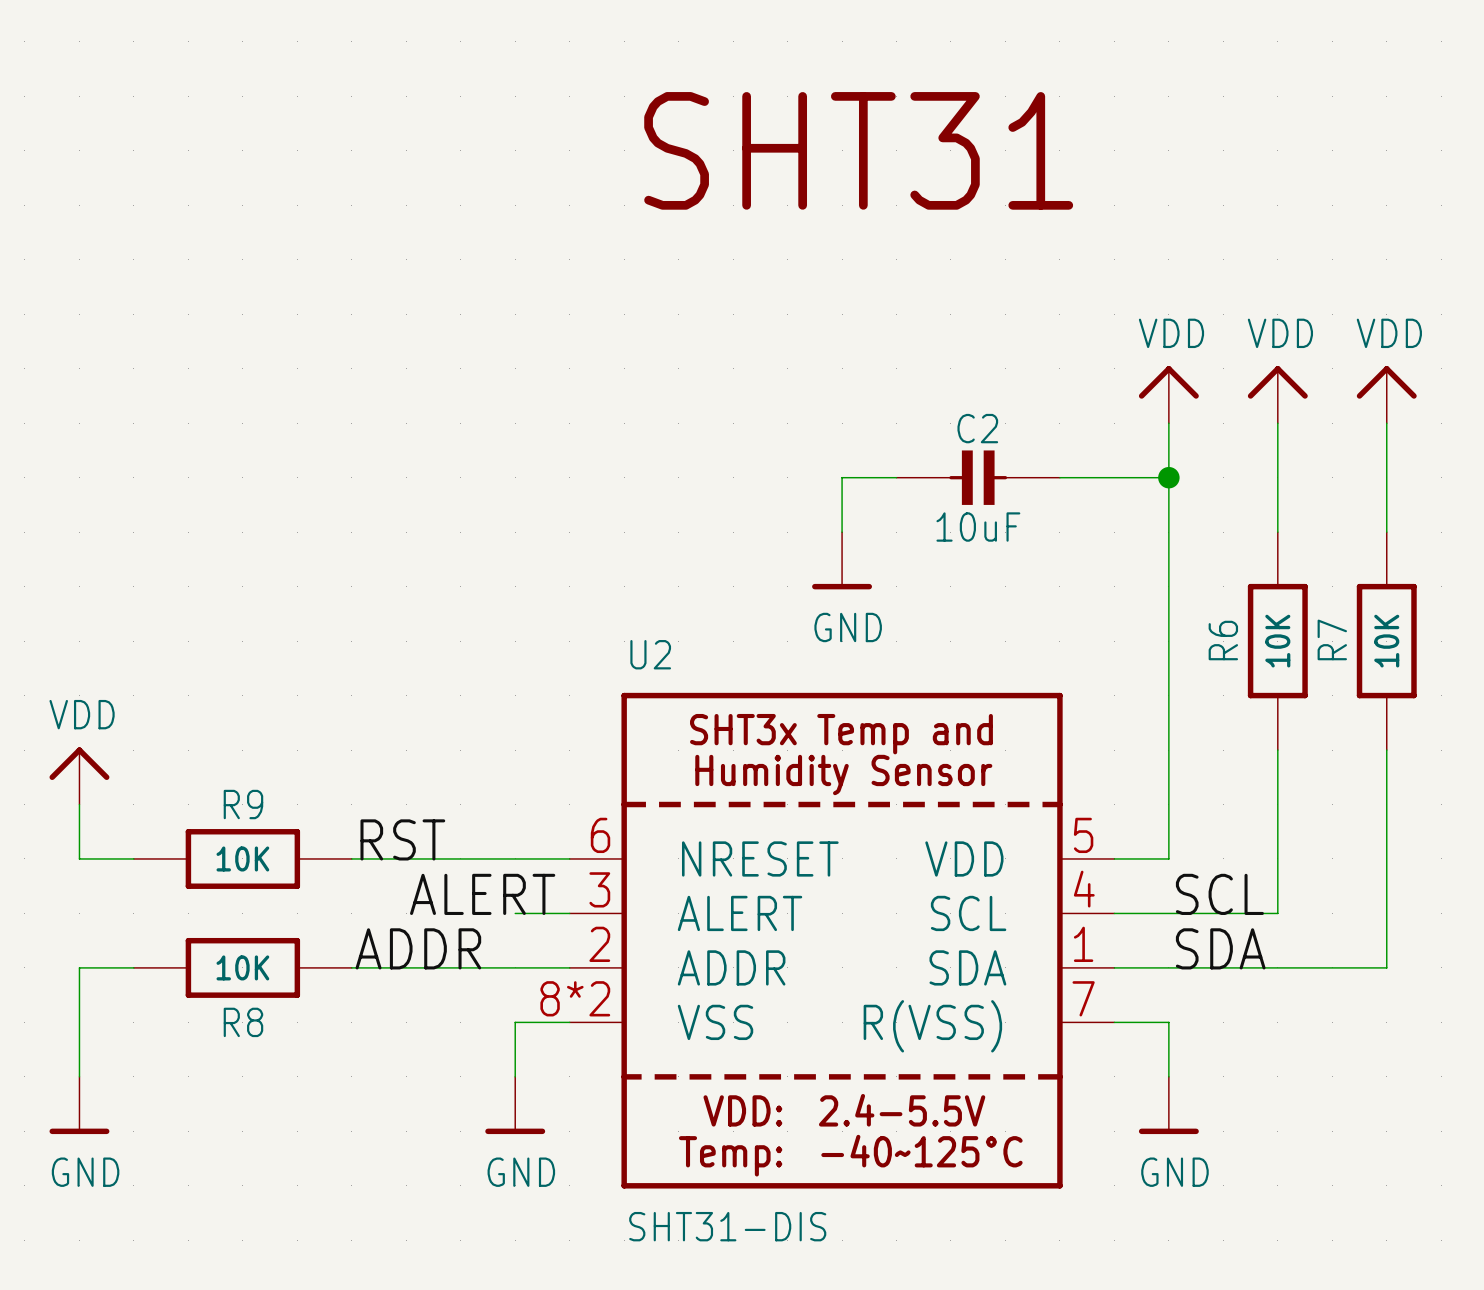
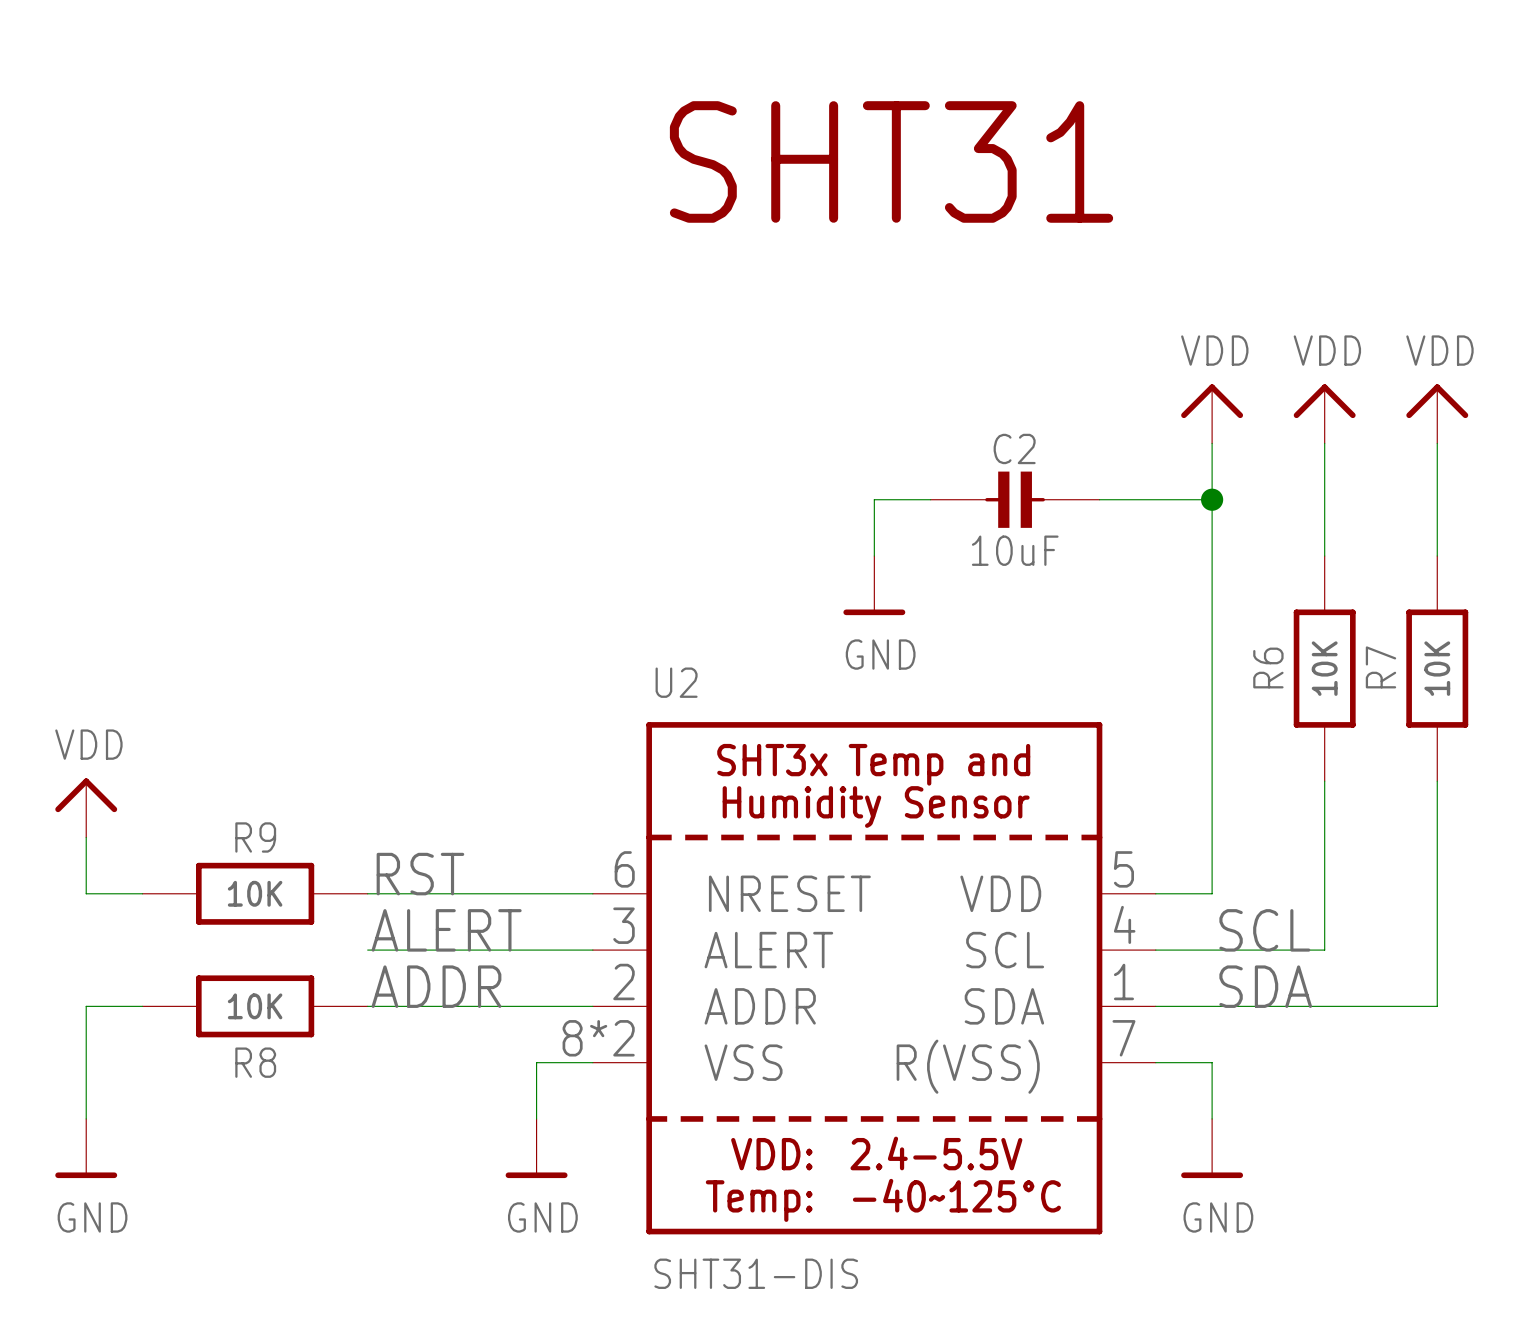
label position: ALERT (482, 894) -> ALERT (446, 930)
wire: none -> (367, 950) (536, 950)

